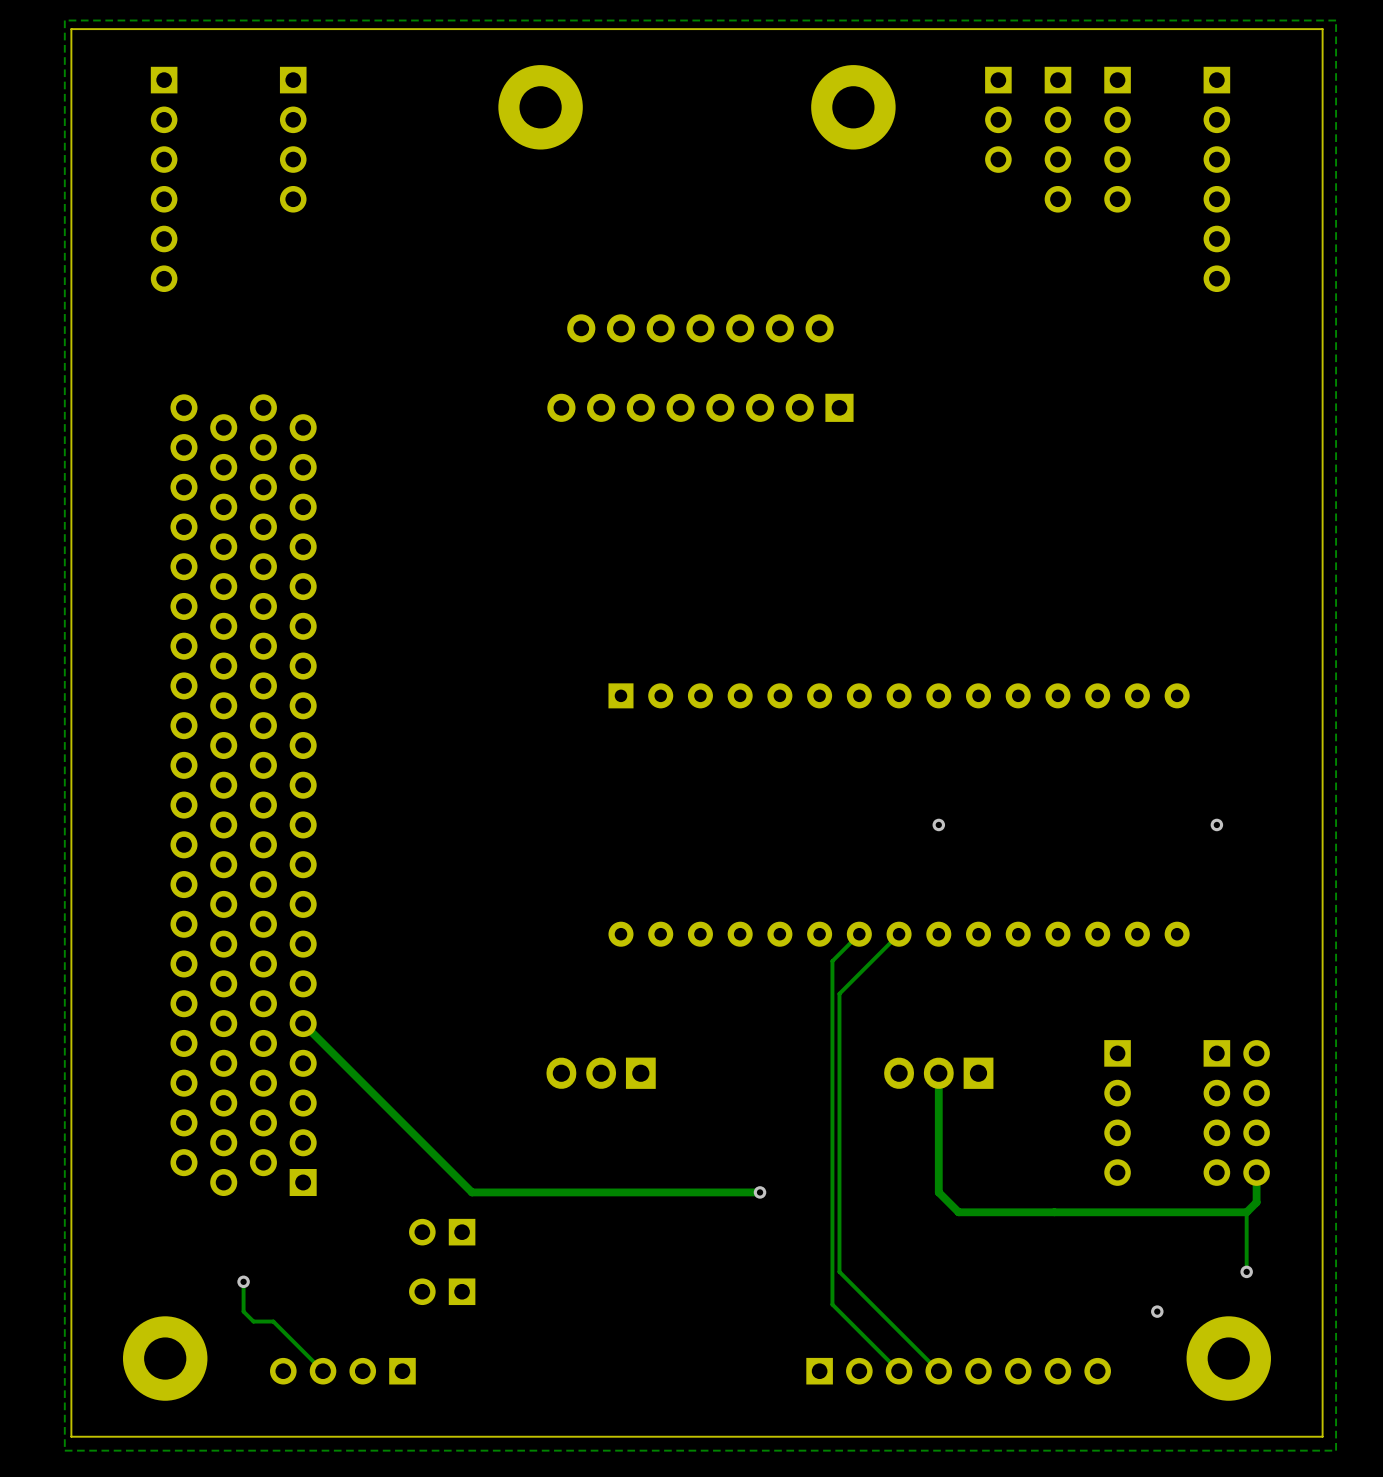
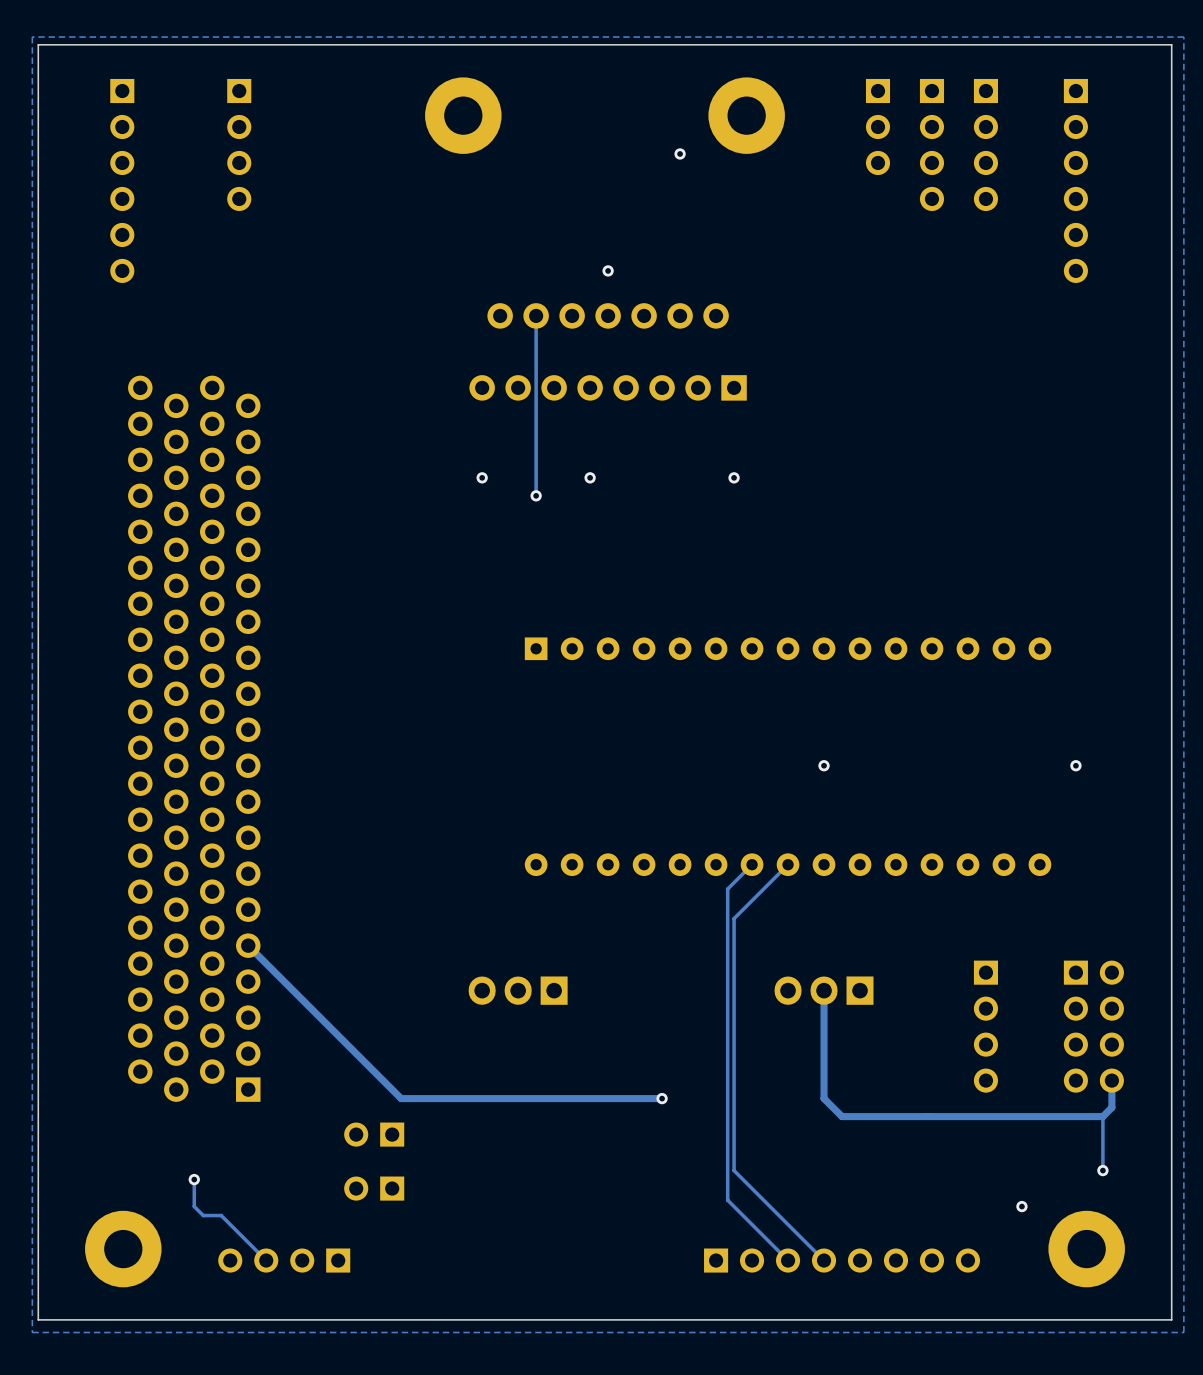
via: none -> (680, 153)
via: none -> (608, 270)
track: none -> (536, 315) (536, 495)
via: none -> (482, 477)
via: none -> (590, 477)
via: none -> (734, 477)
via: none -> (536, 495)

